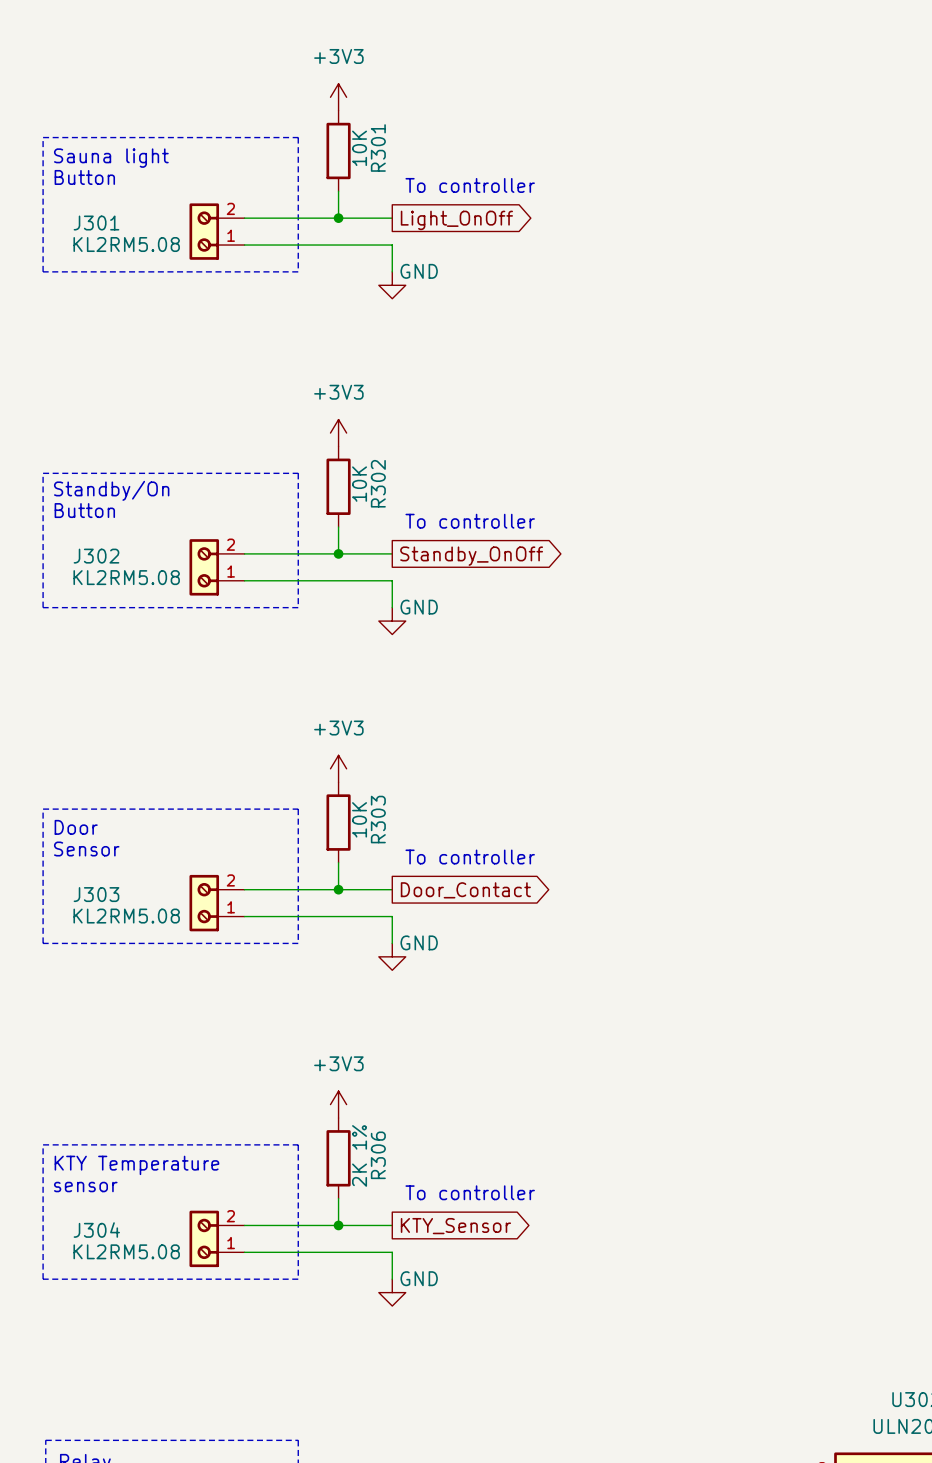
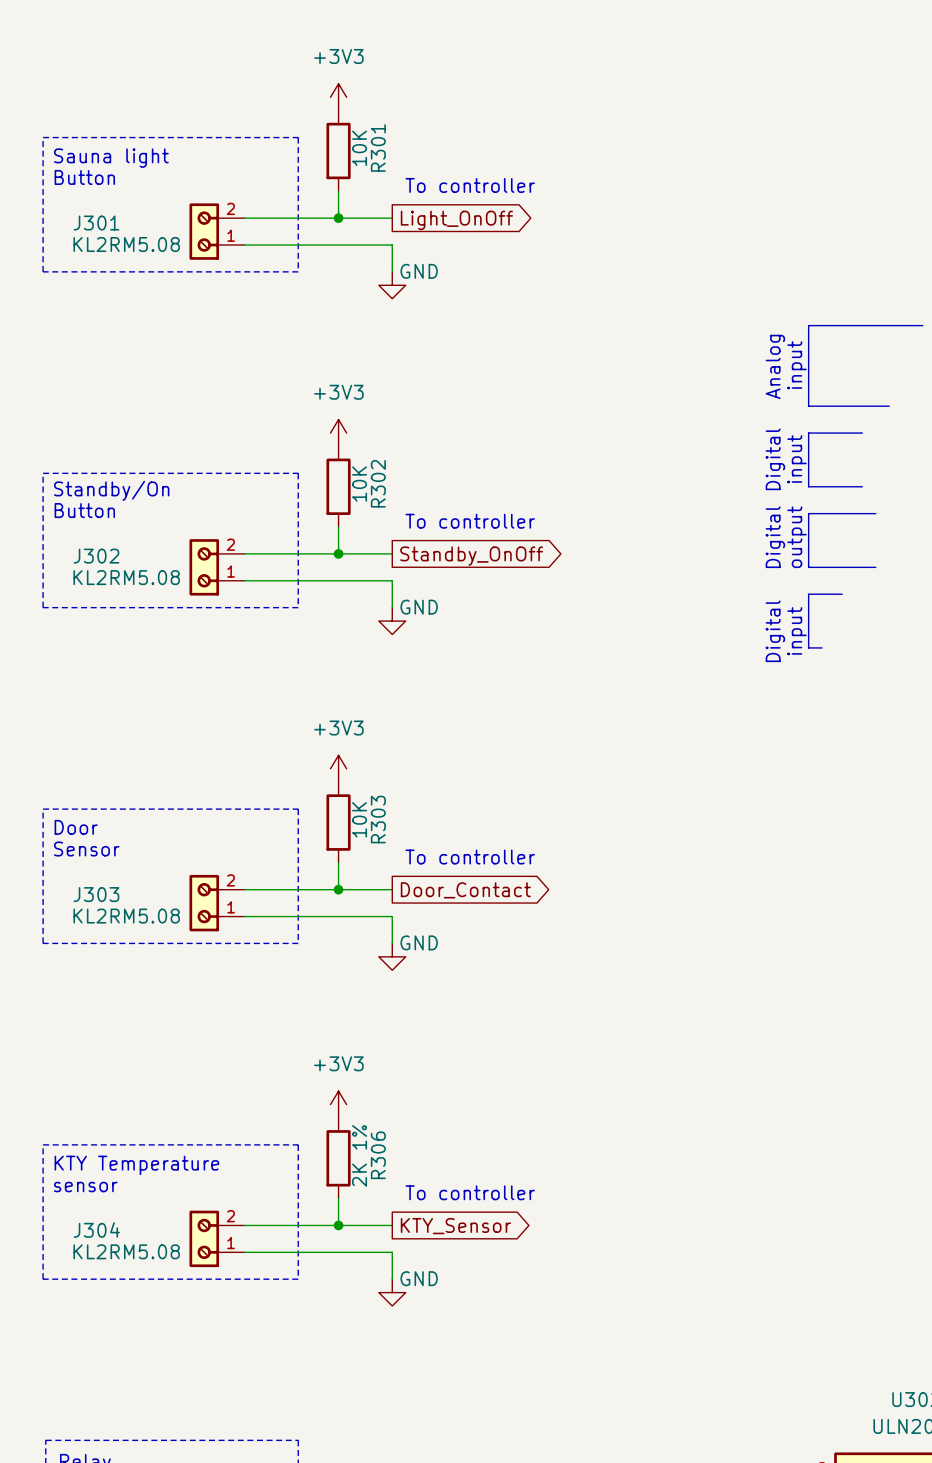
line: none -> (922, 325) (808, 325) (808, 406) (889, 406)
text: none -> input (797, 365)
text: none -> Analog (775, 366)
line: none -> (862, 433) (808, 433) (808, 486) (862, 486)
text: none -> Digital (775, 459)
text: none -> input (797, 459)
line: none -> (875, 513) (808, 513) (808, 567) (875, 567)
text: none -> Digital (775, 537)
text: none -> output (797, 537)
line: none -> (842, 594) (808, 594) (808, 647) (822, 647)
text: none -> Digital (775, 631)
text: none -> input (797, 631)

